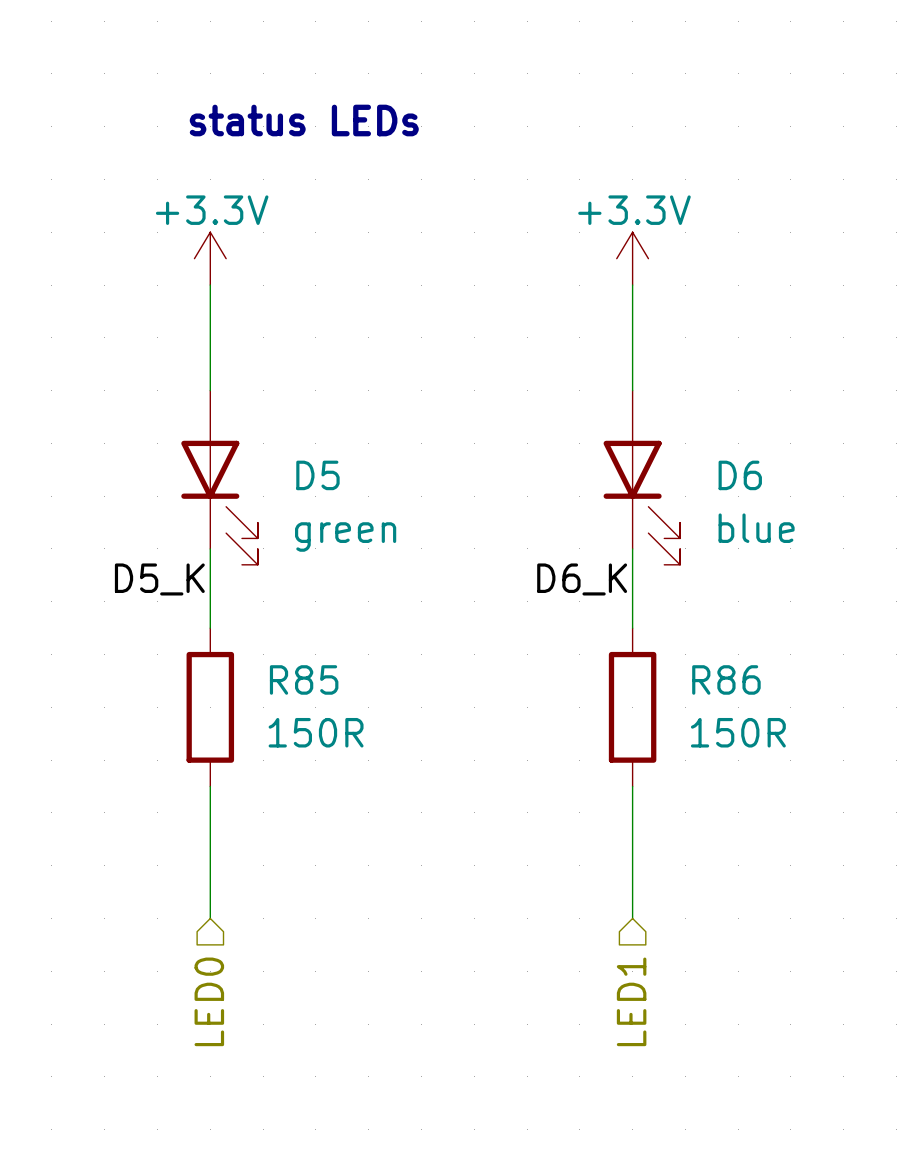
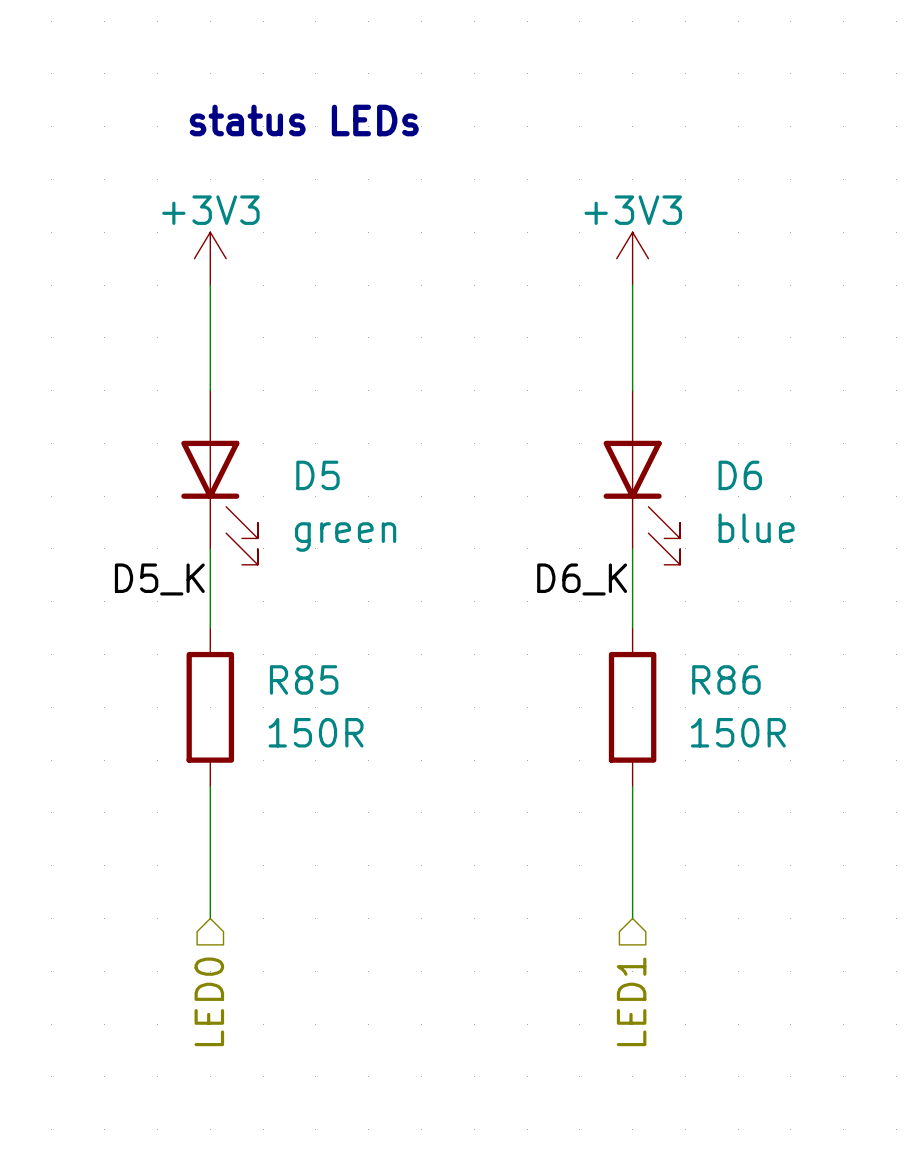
power symbol: +3.3V (210, 258) -> +3V3 (210, 258)
power symbol: +3.3V (632, 258) -> +3V3 (632, 258)

